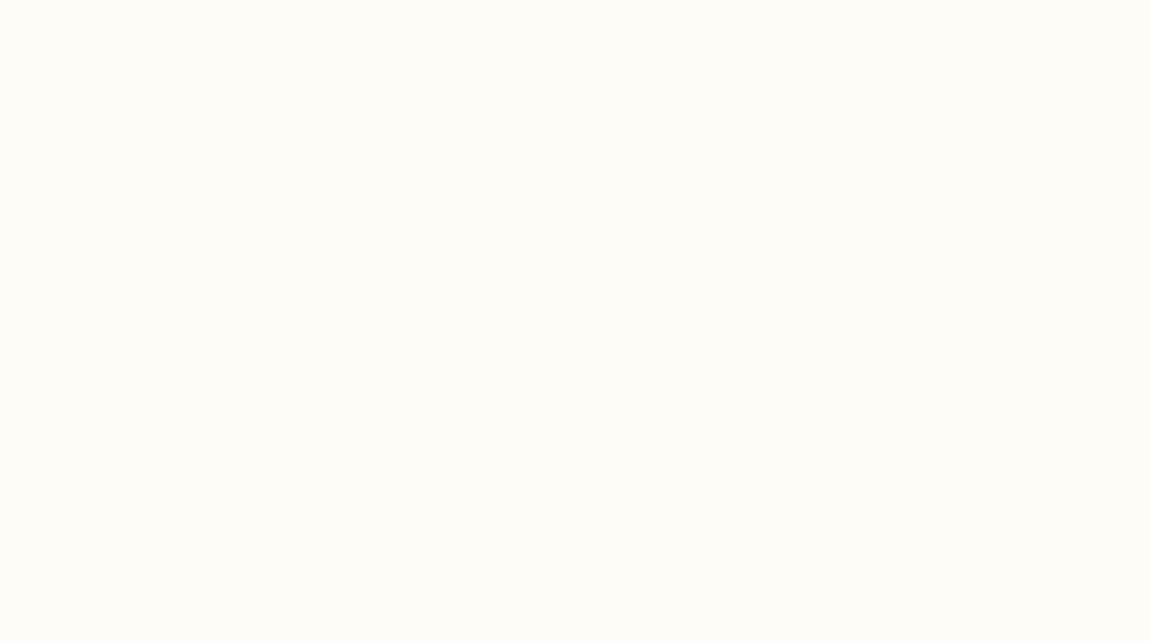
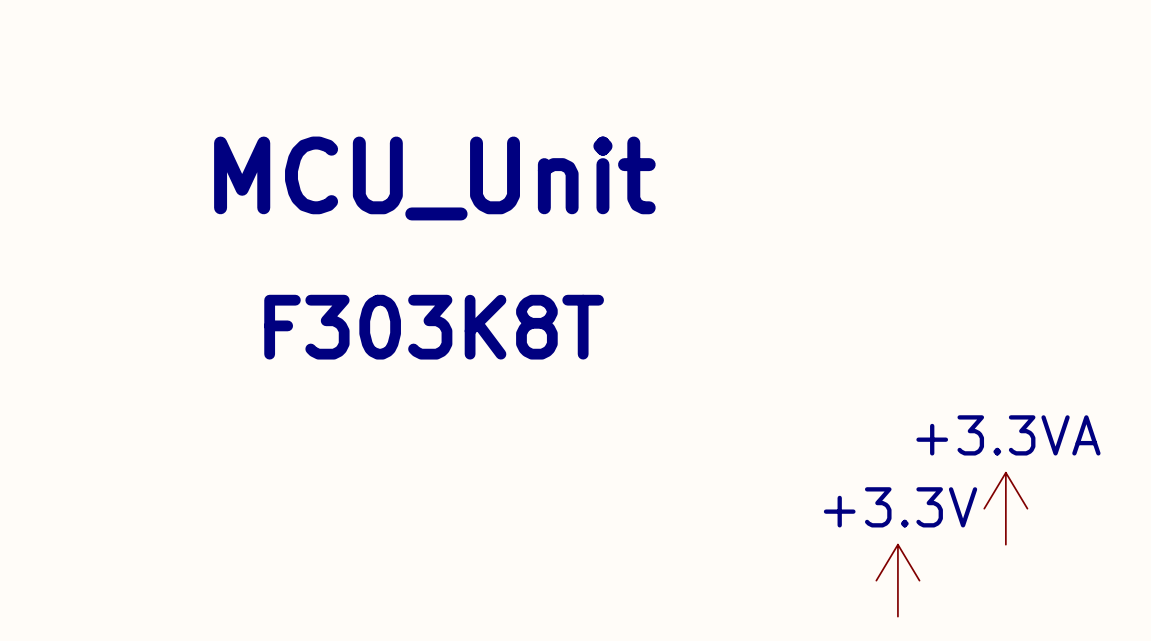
text: none -> MCU_Unit (434, 178)
text: none -> F303K8T (434, 327)
power symbol: none -> +3.3VA (1005, 508)
power symbol: none -> +3.3V (897, 580)

